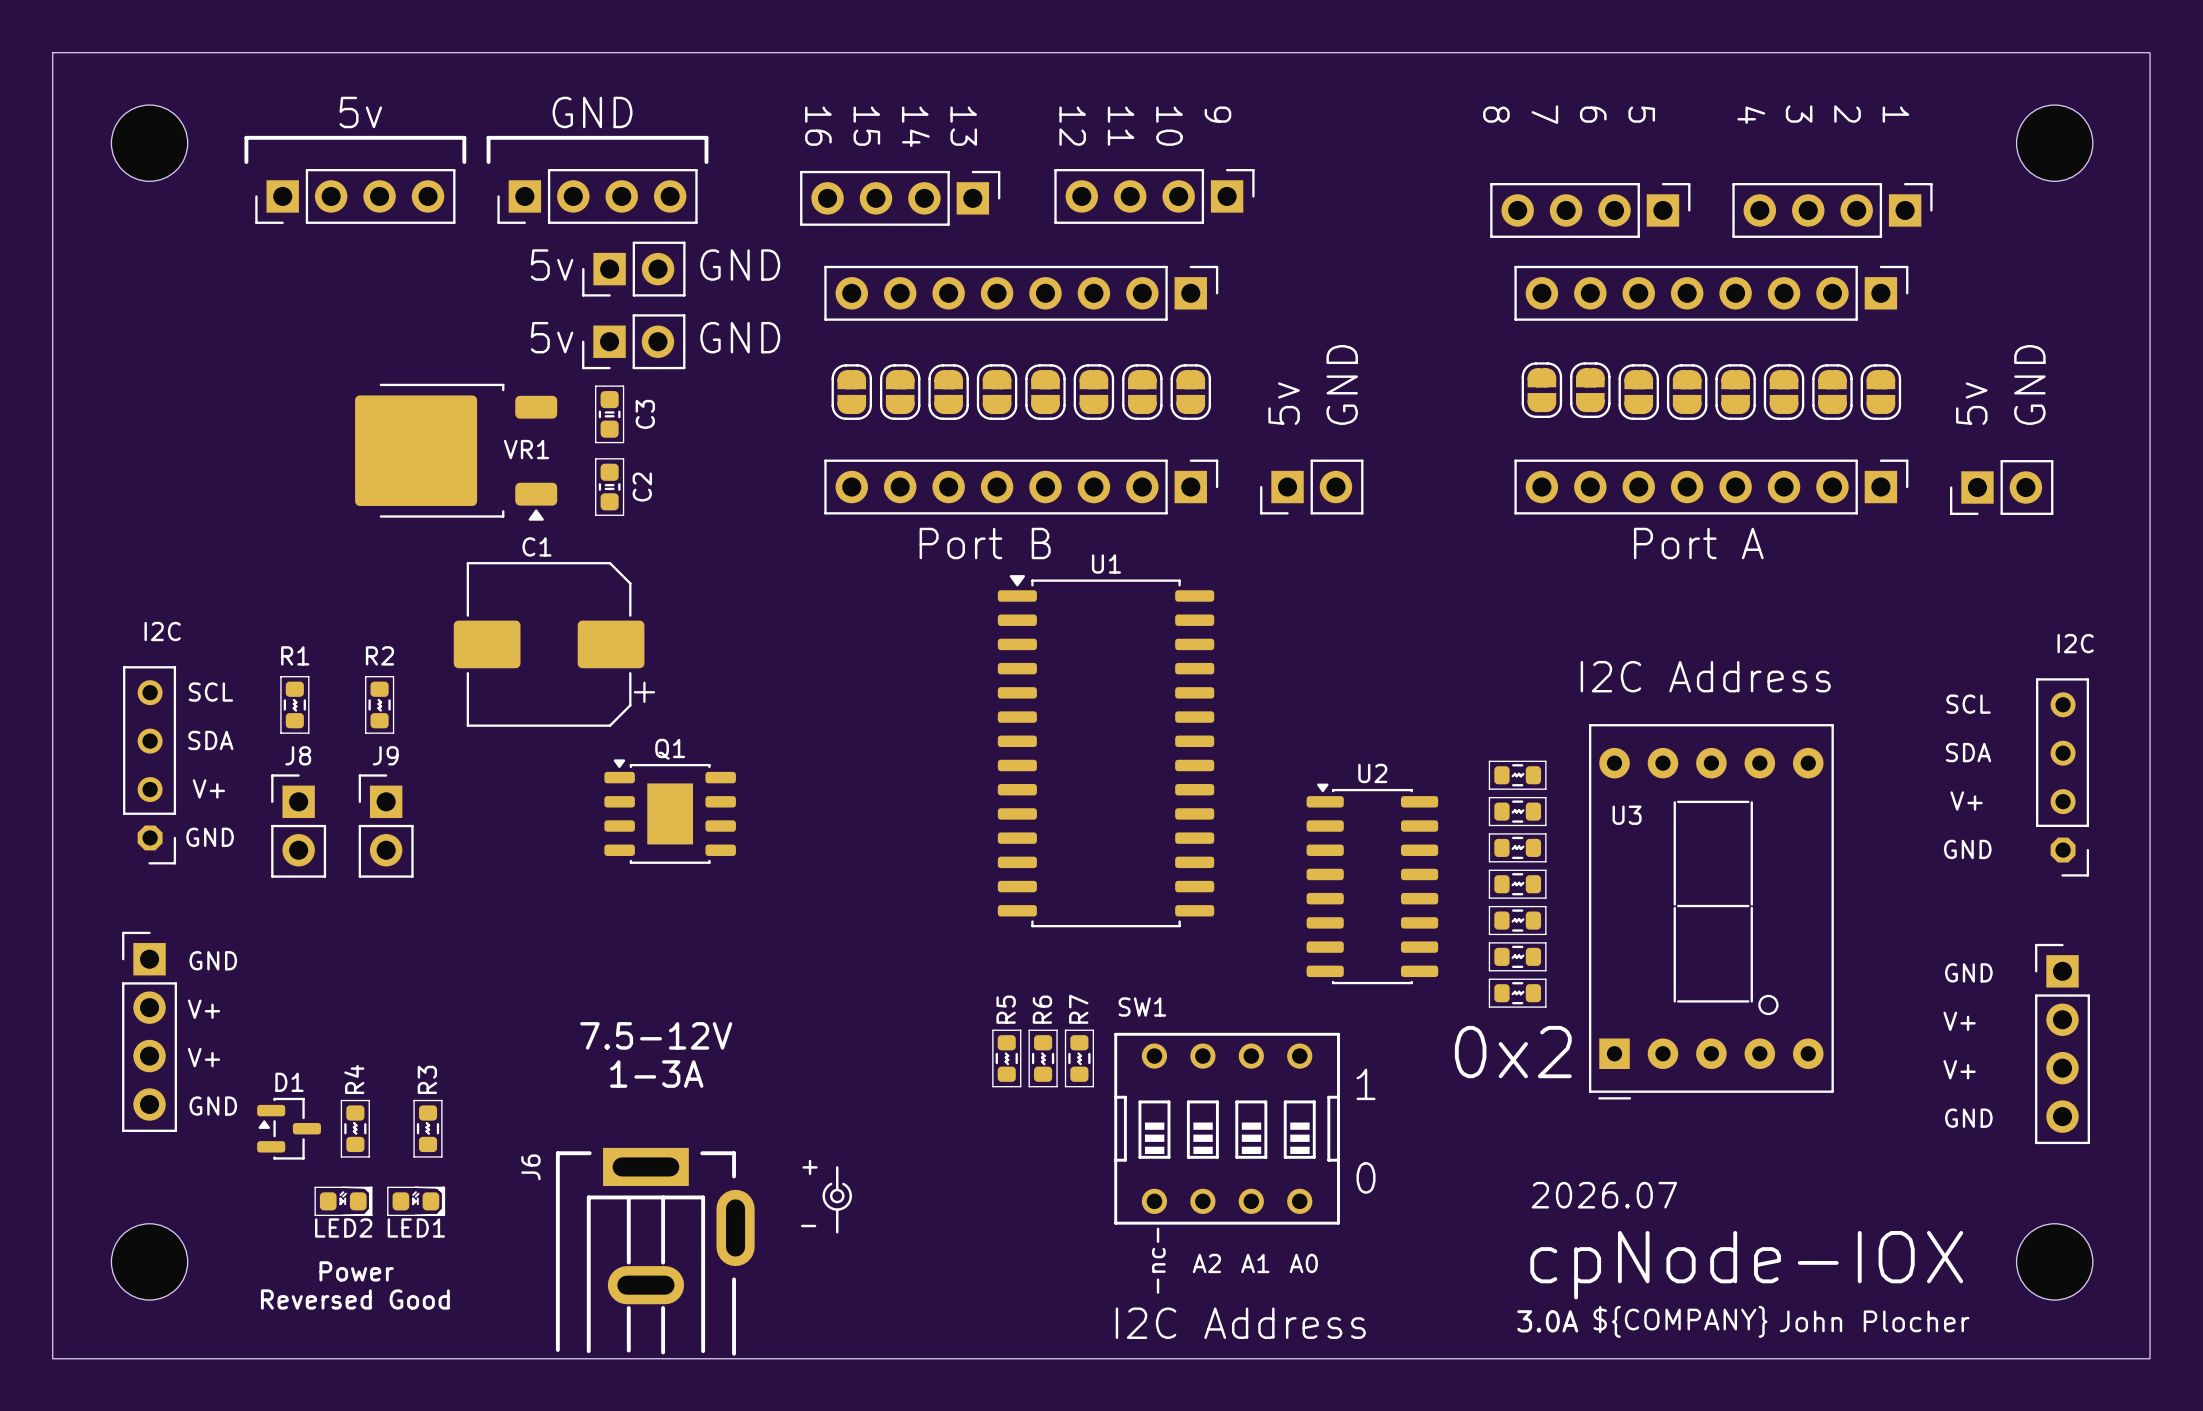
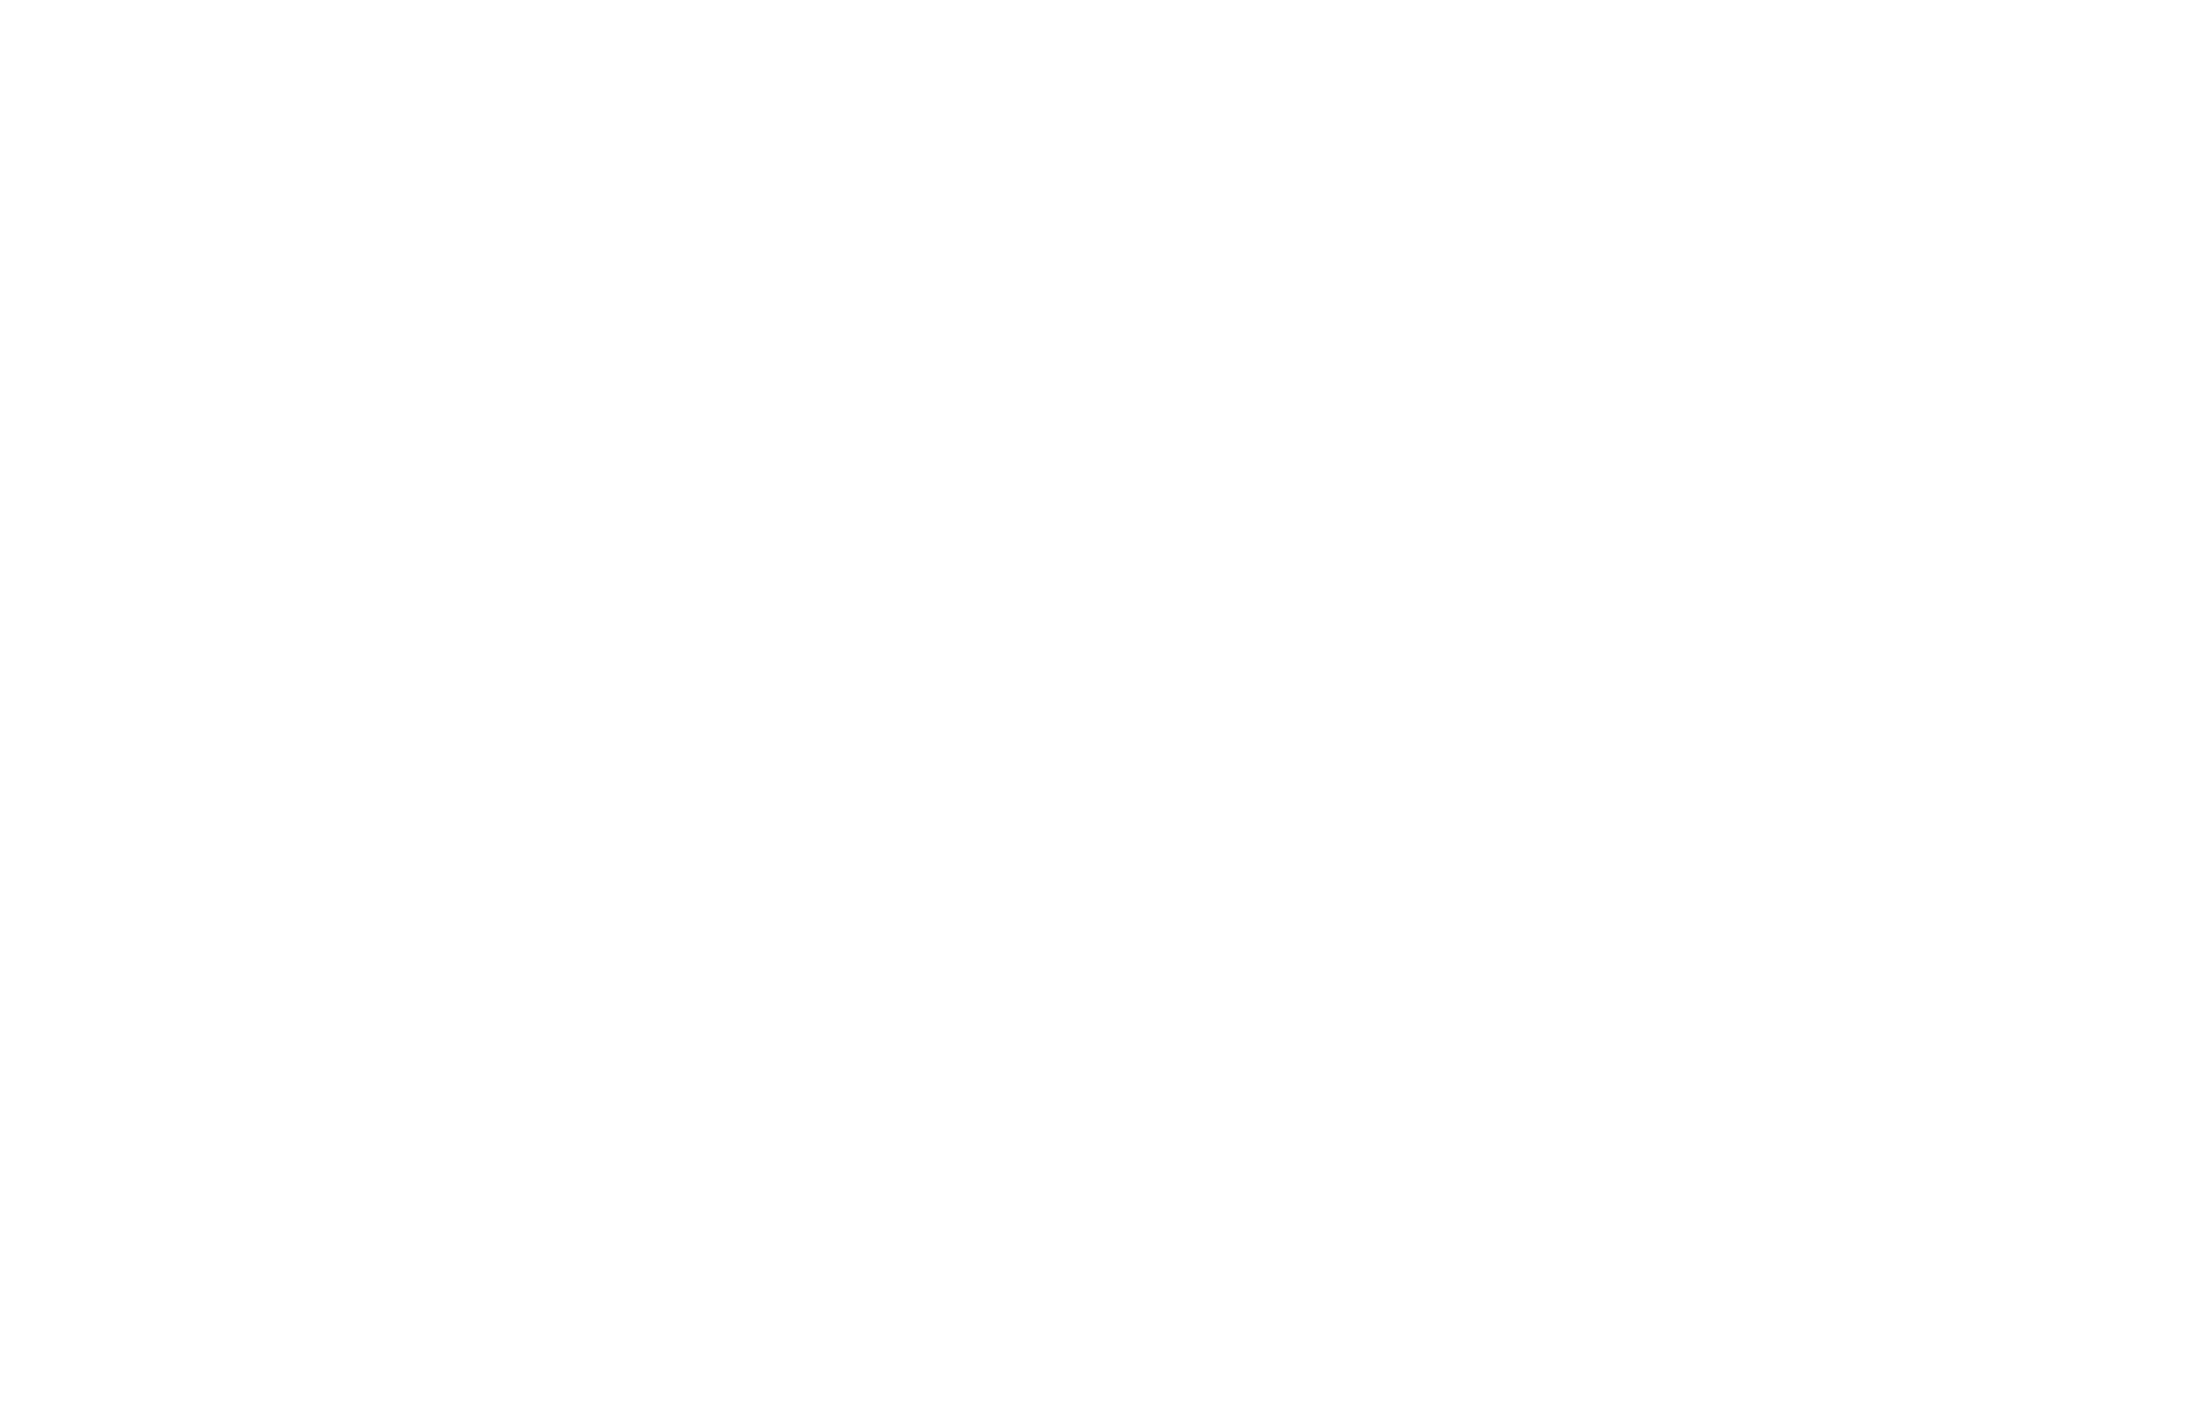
text: 5v (360, 112) -> none
text: GND (592, 112) -> none
text: 9 (1217, 114) -> none
text: 8 (1496, 114) -> none
text: 7 (1544, 114) -> none
text: 6 (1593, 114) -> none
text: 5 (1641, 114) -> none
text: 3 (1799, 114) -> none
text: 2 (1847, 114) -> none
text: 1 (1895, 114) -> none
text: 4 (1751, 115) -> none
text: 16 (818, 126) -> none
text: 15 (866, 126) -> none
text: 14 (915, 126) -> none
text: 13 (963, 126) -> none
text: 12 (1072, 126) -> none
text: 11 (1121, 126) -> none
text: 10 (1169, 126) -> none
line: (246, 162) (246, 137) (464, 137) (464, 162) -> none
line: (488, 162) (488, 137) (706, 137) (706, 162) -> none
part: (355, 196) -> none
part: (597, 196) -> none
part: (1154, 196) -> none
part: (900, 198) -> none
part: (1590, 210) -> none
part: (1832, 210) -> none
text: 5v (552, 265) -> none
text: GND (740, 265) -> none
part: (633, 269) -> none
part: (1021, 293) -> none
part: (1711, 293) -> none
text: 5v (552, 337) -> none
text: GND (740, 337) -> none
part: (633, 341) -> none
text: GND (1342, 384) -> none
text: GND (2029, 384) -> none
part: (1541, 390) -> none
part: (1590, 390) -> none
part: (851, 392) -> none
part: (900, 392) -> none
part: (948, 392) -> none
part: (997, 392) -> none
part: (1045, 392) -> none
part: (1093, 392) -> none
part: (1142, 392) -> none
part: (1190, 392) -> none
part: (1638, 392) -> none
part: (1687, 392) -> none
part: (1735, 392) -> none
part: (1784, 392) -> none
part: (1832, 392) -> none
part: (1880, 392) -> none
text: 5v (1284, 403) -> none
text: 5v (1971, 403) -> none
C3: (609, 414) -> none
VR1: (456, 452) -> none
C2: (609, 487) -> none
part: (1021, 487) -> none
part: (1311, 487) -> none
part: (1711, 487) -> none
part: (2001, 487) -> none
text: Port B (985, 543) -> none
text: Port A (1698, 543) -> none
C1: (554, 644) -> none
text: I2C Address (1705, 676) -> none
R1: (294, 704) -> none
R2: (379, 704) -> none
part: (1101, 705) -> none
U1: (1106, 751) -> none
part: (149, 765) -> none
part: (1517, 775) -> none
part: (2062, 777) -> none
Q1: (670, 811) -> none
part: (1517, 811) -> none
J8: (298, 826) -> none
J9: (386, 826) -> none
part: (1517, 847) -> none
U2: (1372, 883) -> none
part: (1517, 884) -> none
U3: (1711, 911) -> none
part: (1517, 920) -> none
part: (1517, 956) -> none
text: GND (213, 960) -> none
text: GND (1968, 972) -> none
part: (1517, 993) -> none
text: V+ (204, 1009) -> none
text: V+ (1959, 1021) -> none
part: (149, 1031) -> none
part: (2062, 1043) -> none
text: 0x2 (1513, 1052) -> none
text: V+ (204, 1057) -> none
R5: (1006, 1058) -> none
R6: (1043, 1058) -> none
R7: (1079, 1058) -> none
text: V+ (1959, 1069) -> none
text: 1 (1366, 1084) -> none
text: GND (213, 1106) -> none
text: GND (1968, 1118) -> none
D1: (289, 1128) -> none
R4: (355, 1128) -> none
R3: (427, 1128) -> none
SW1: (1227, 1128) -> none
drawing: [822, 1166, 852, 1234] -> none
text: 0 (1366, 1177) -> none
drawing: [1517, 1181, 1970, 1338] -> none
LED2: (343, 1201) -> none
LED1: (416, 1201) -> none
J6: (655, 1251) -> none
text: -nc- (1158, 1260) -> none
text: A2 (1206, 1263) -> none
text: A1 (1255, 1263) -> none
text: A0 (1303, 1263) -> none
text: Power (356, 1271) -> none
text: Reversed Good (355, 1299) -> none
text: I2C Address (1240, 1323) -> none

